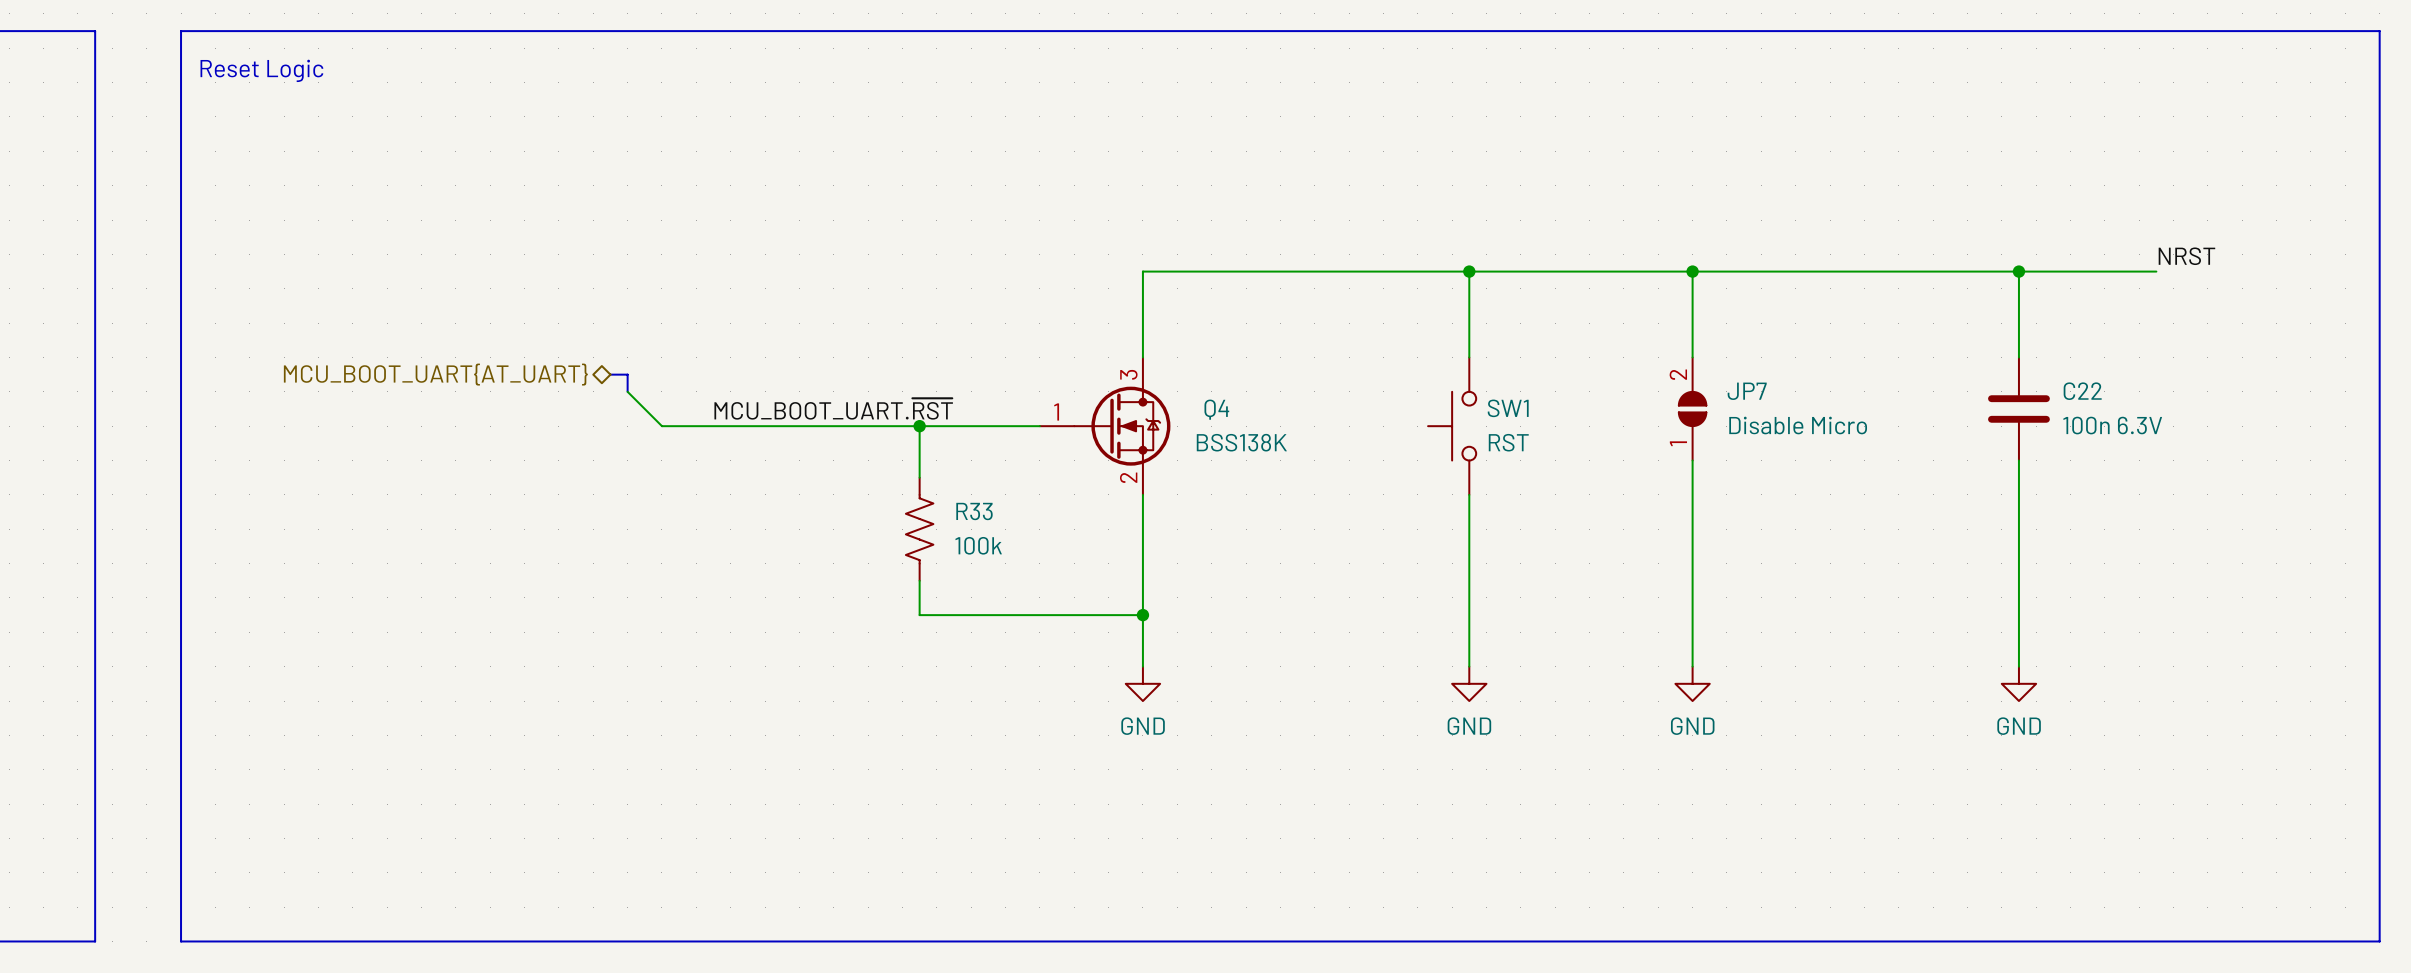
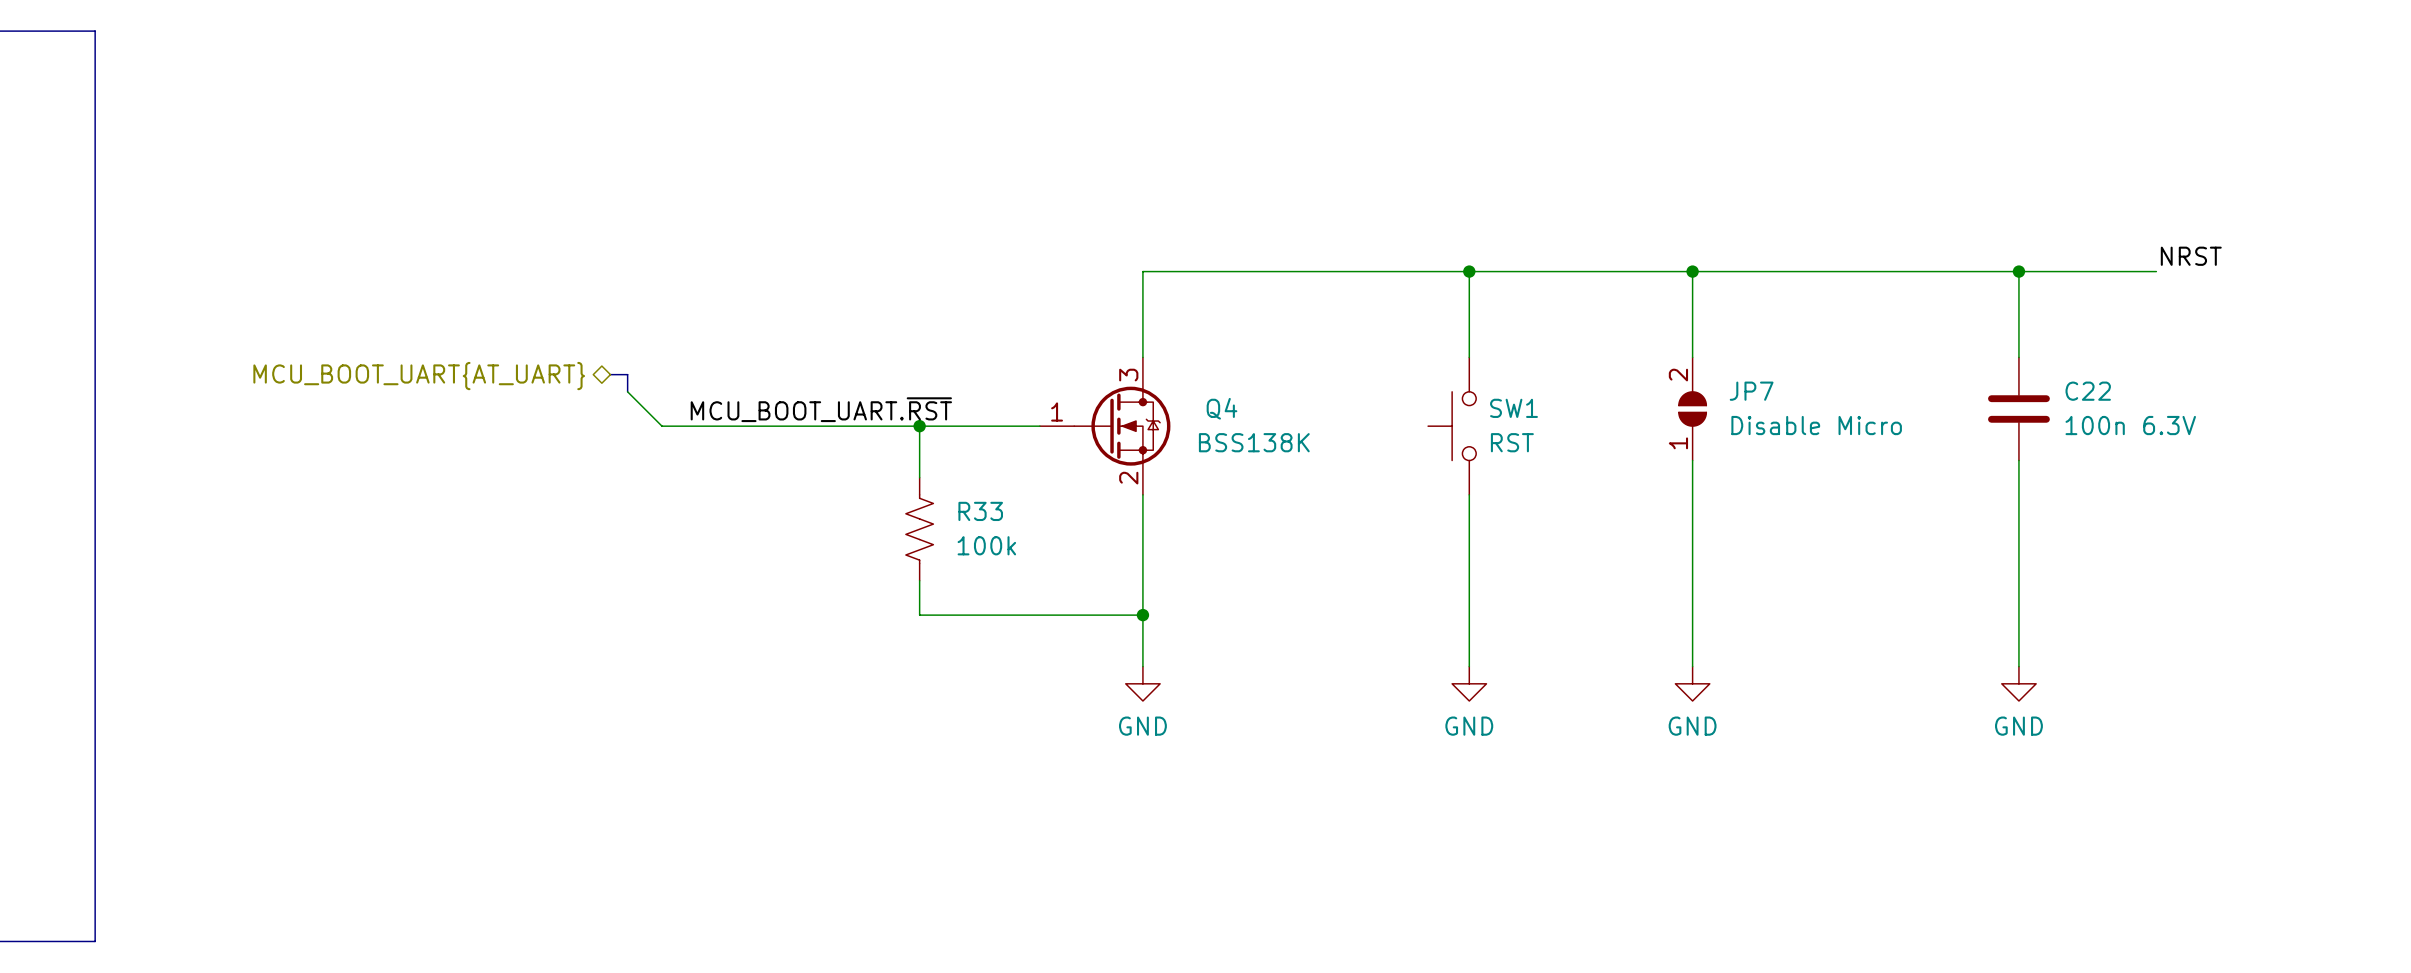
line: (181, 31) (2379, 31) (2379, 941) (181, 941) (181, 31) -> none
text: Reset Logic (261, 70) -> none

